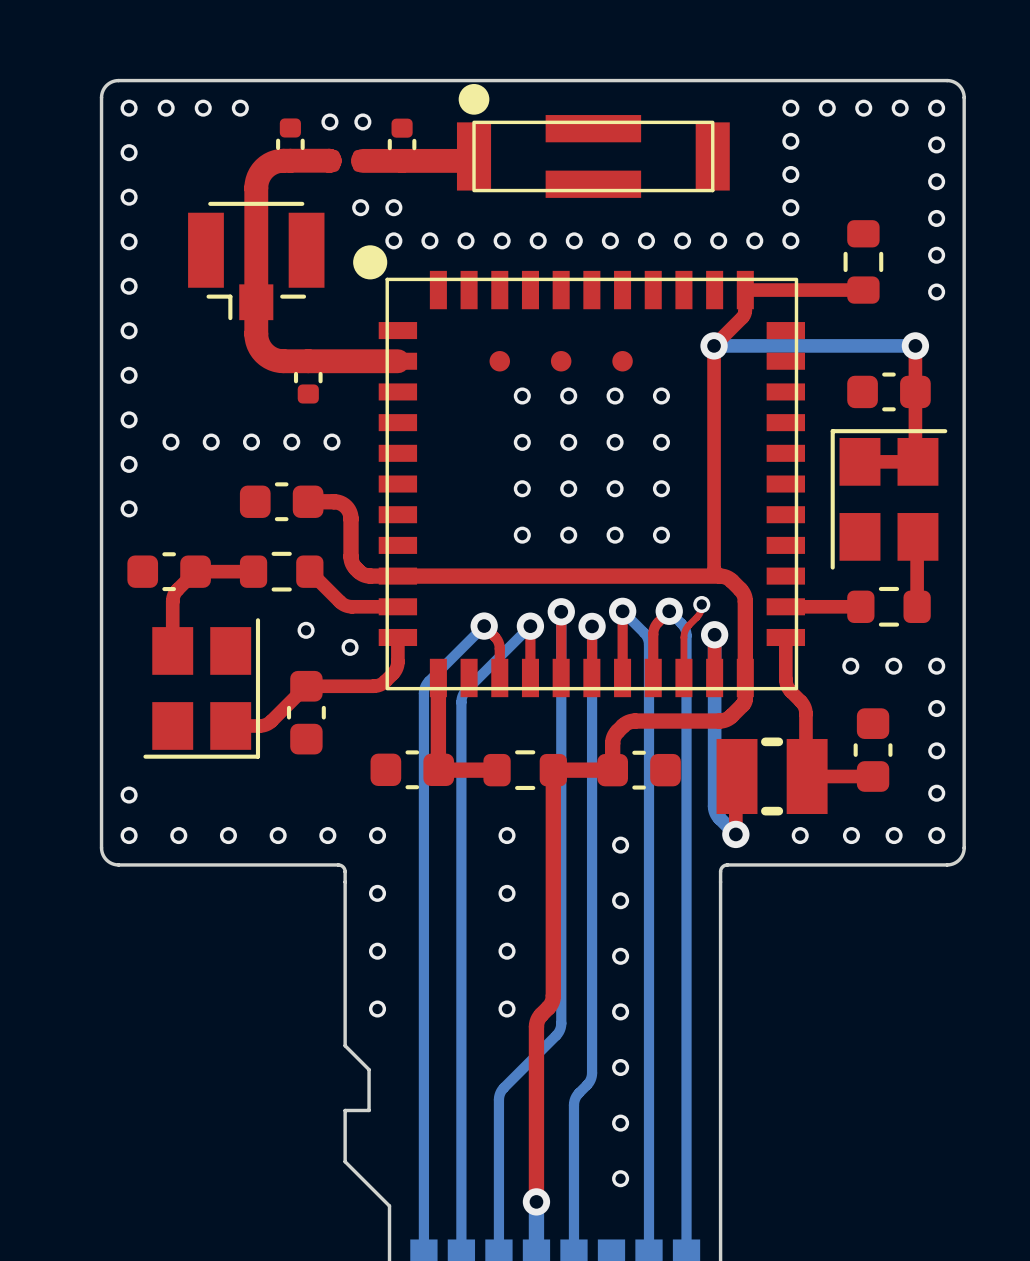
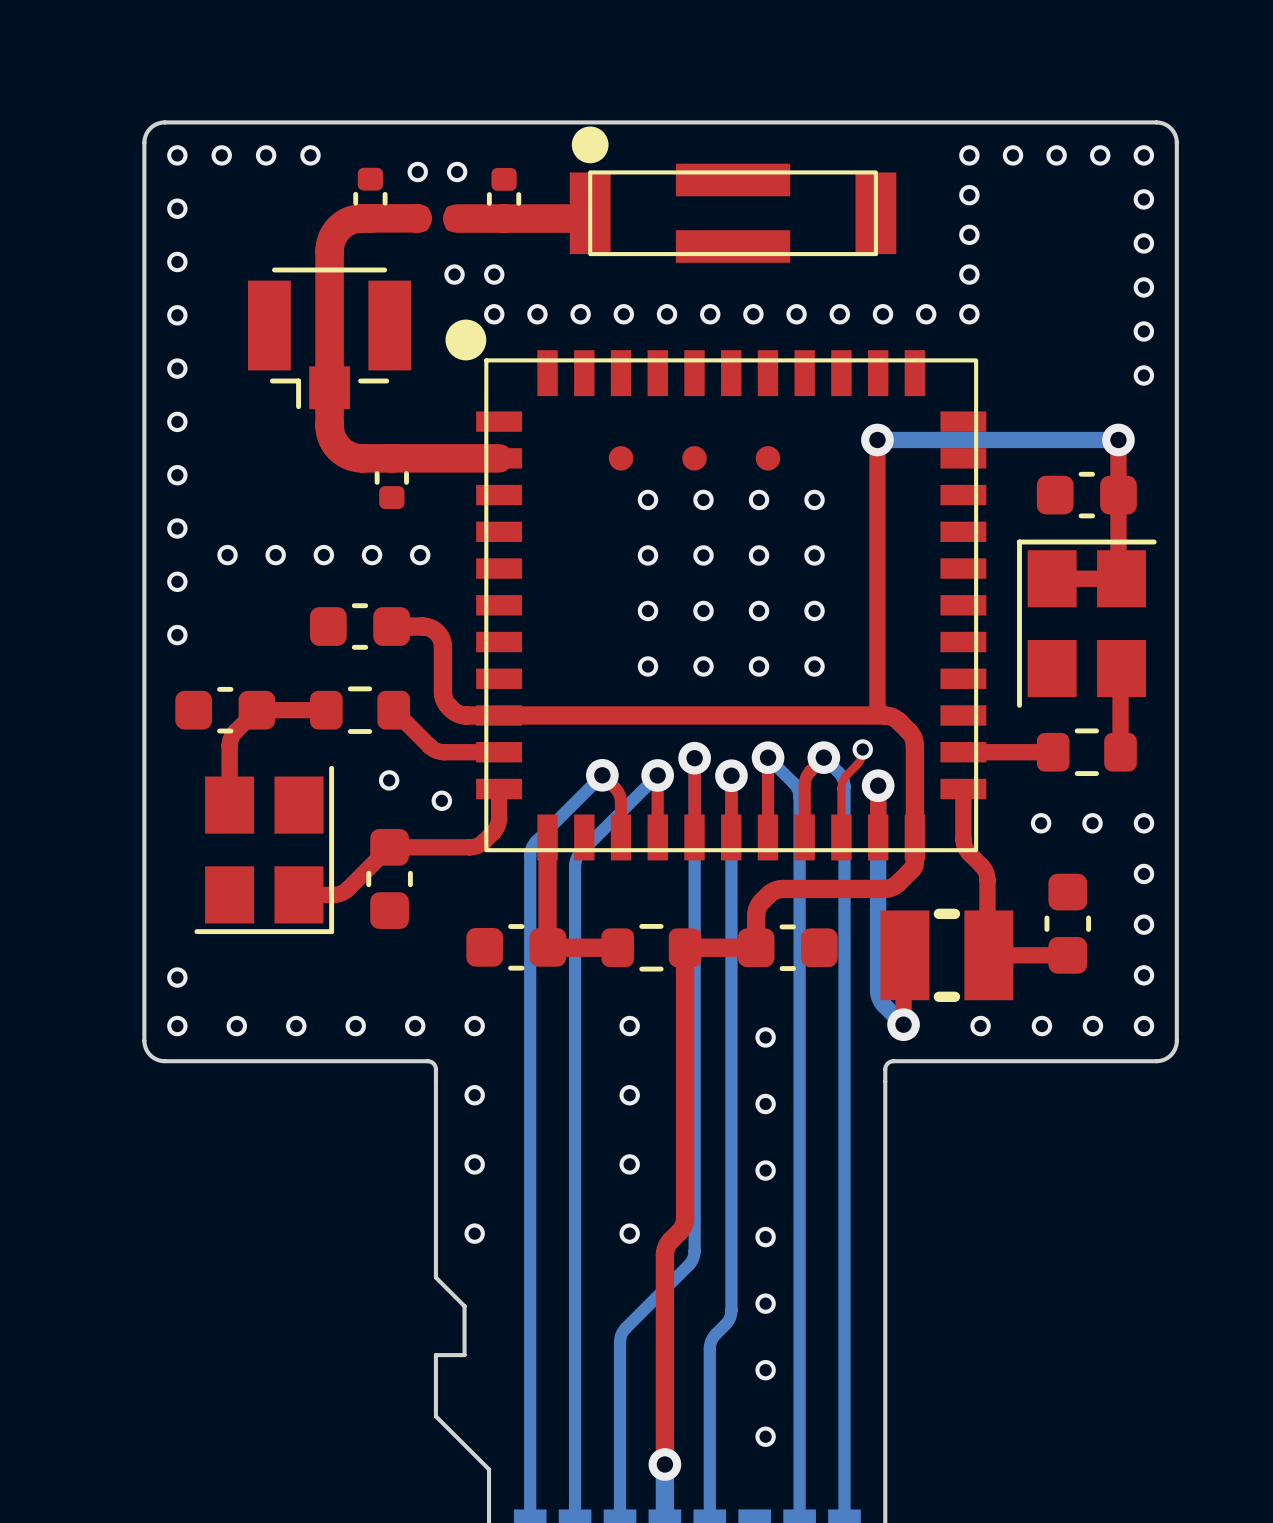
part: (863, 261) -> none
top track: (863, 290) (745, 290) (744, 315) (714, 345) -> none

